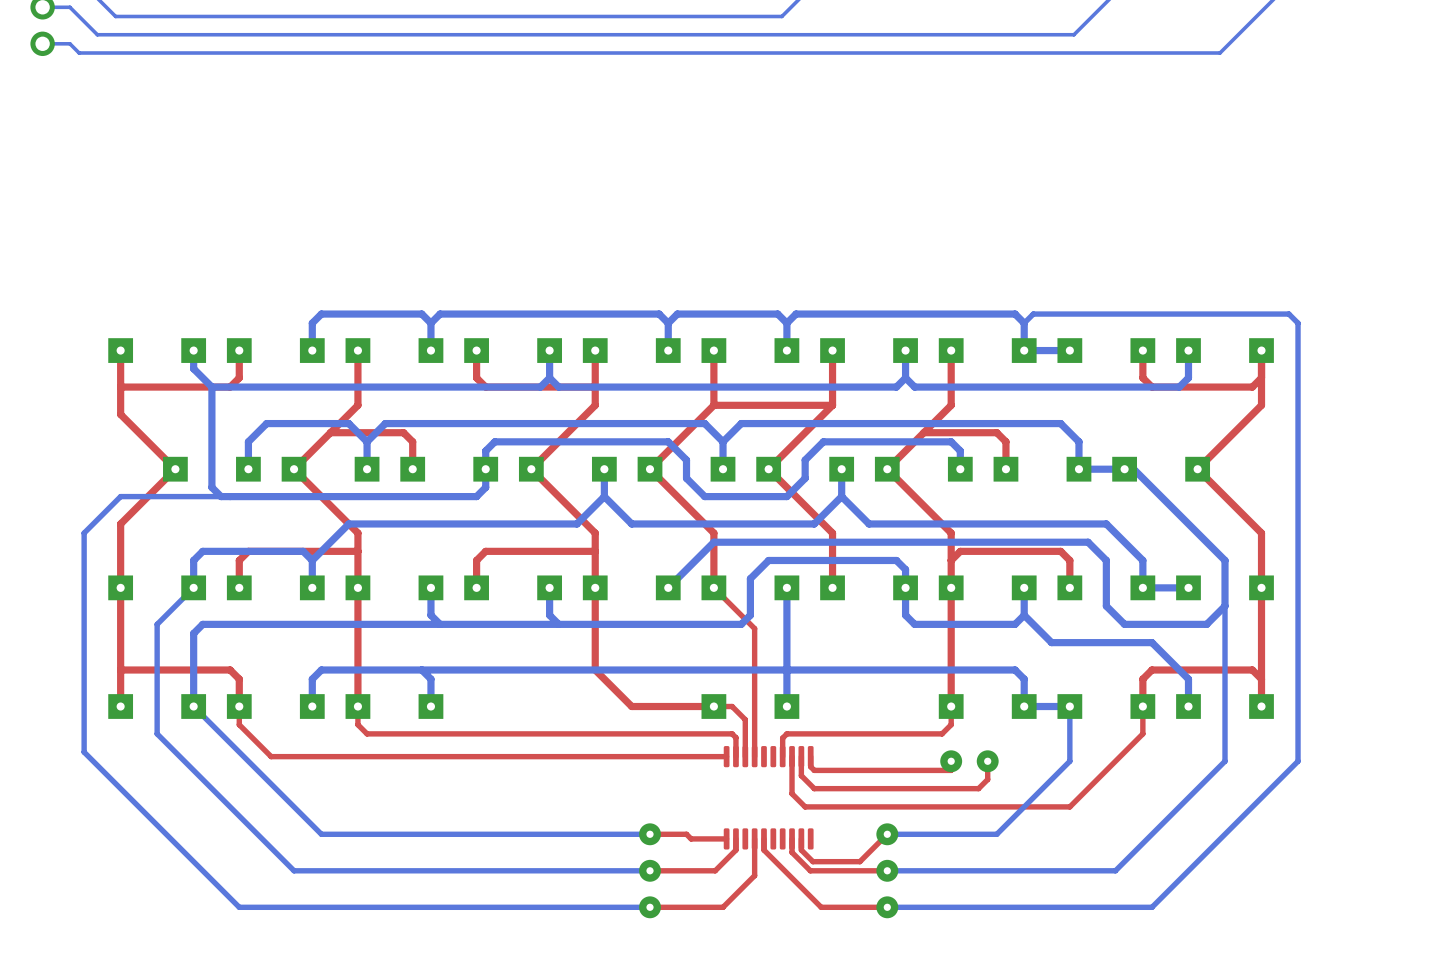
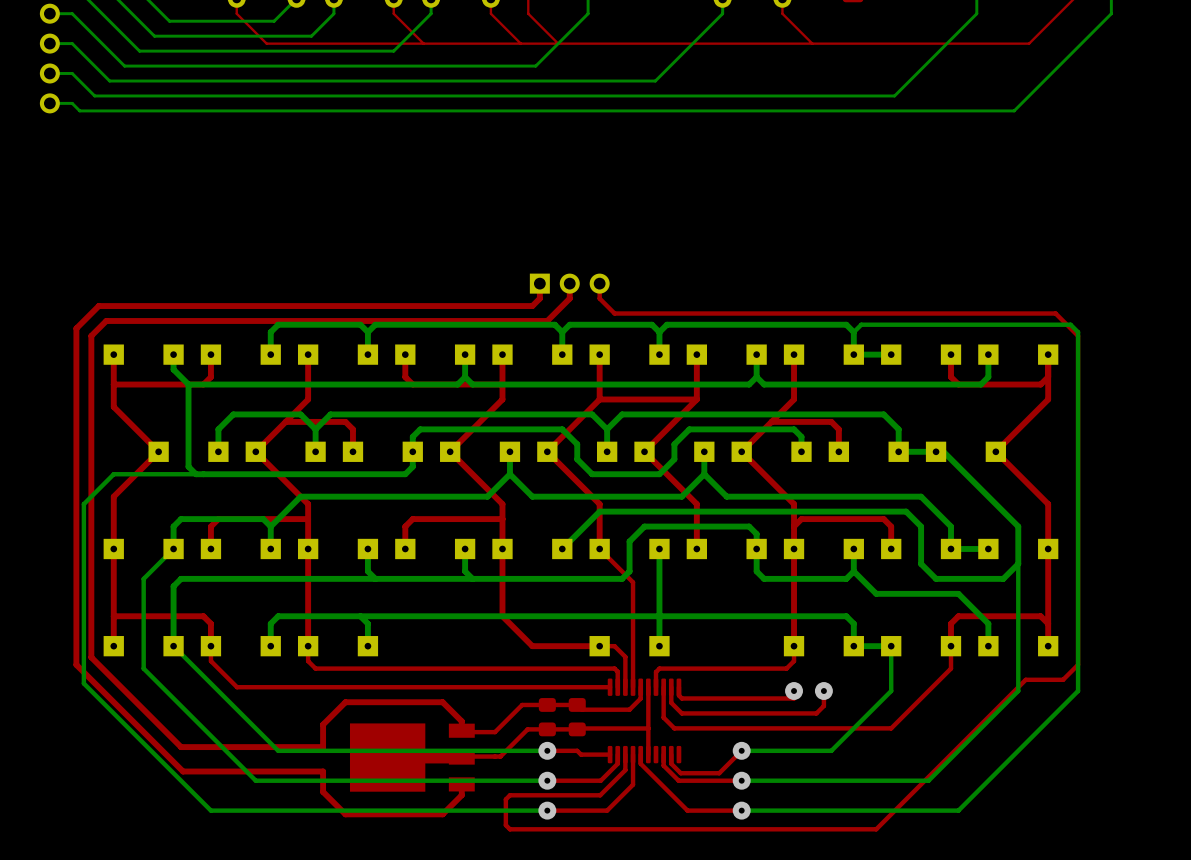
top track: none -> (539, 283) (539, 298) (532, 306) (98, 306) (76, 328) (76, 664) (183, 771) (323, 771) (323, 791) (345, 814) (442, 814) (461, 795) (461, 784)
top track: none -> (569, 283) (569, 298) (547, 320) (106, 320) (91, 335) (91, 657) (181, 747) (323, 747) (323, 724) (345, 702) (442, 702) (461, 721) (463, 732) (495, 732) (522, 704) (577, 704) (581, 709) (629, 709) (640, 698) (640, 687)
part: none -> (569, 283)
top track: none -> (599, 283) (599, 298) (614, 313) (1055, 313) (1078, 335) (1078, 664) (1063, 679) (1025, 679) (876, 829) (509, 829) (505, 825) (505, 799) (509, 795) (600, 795) (625, 770) (625, 754)
top track: none -> (648, 687) (648, 754)
part: none -> (547, 717)
part: none -> (577, 717)
top track: none -> (648, 728) (527, 729) (500, 756) (387, 757)
part: none -> (412, 757)

